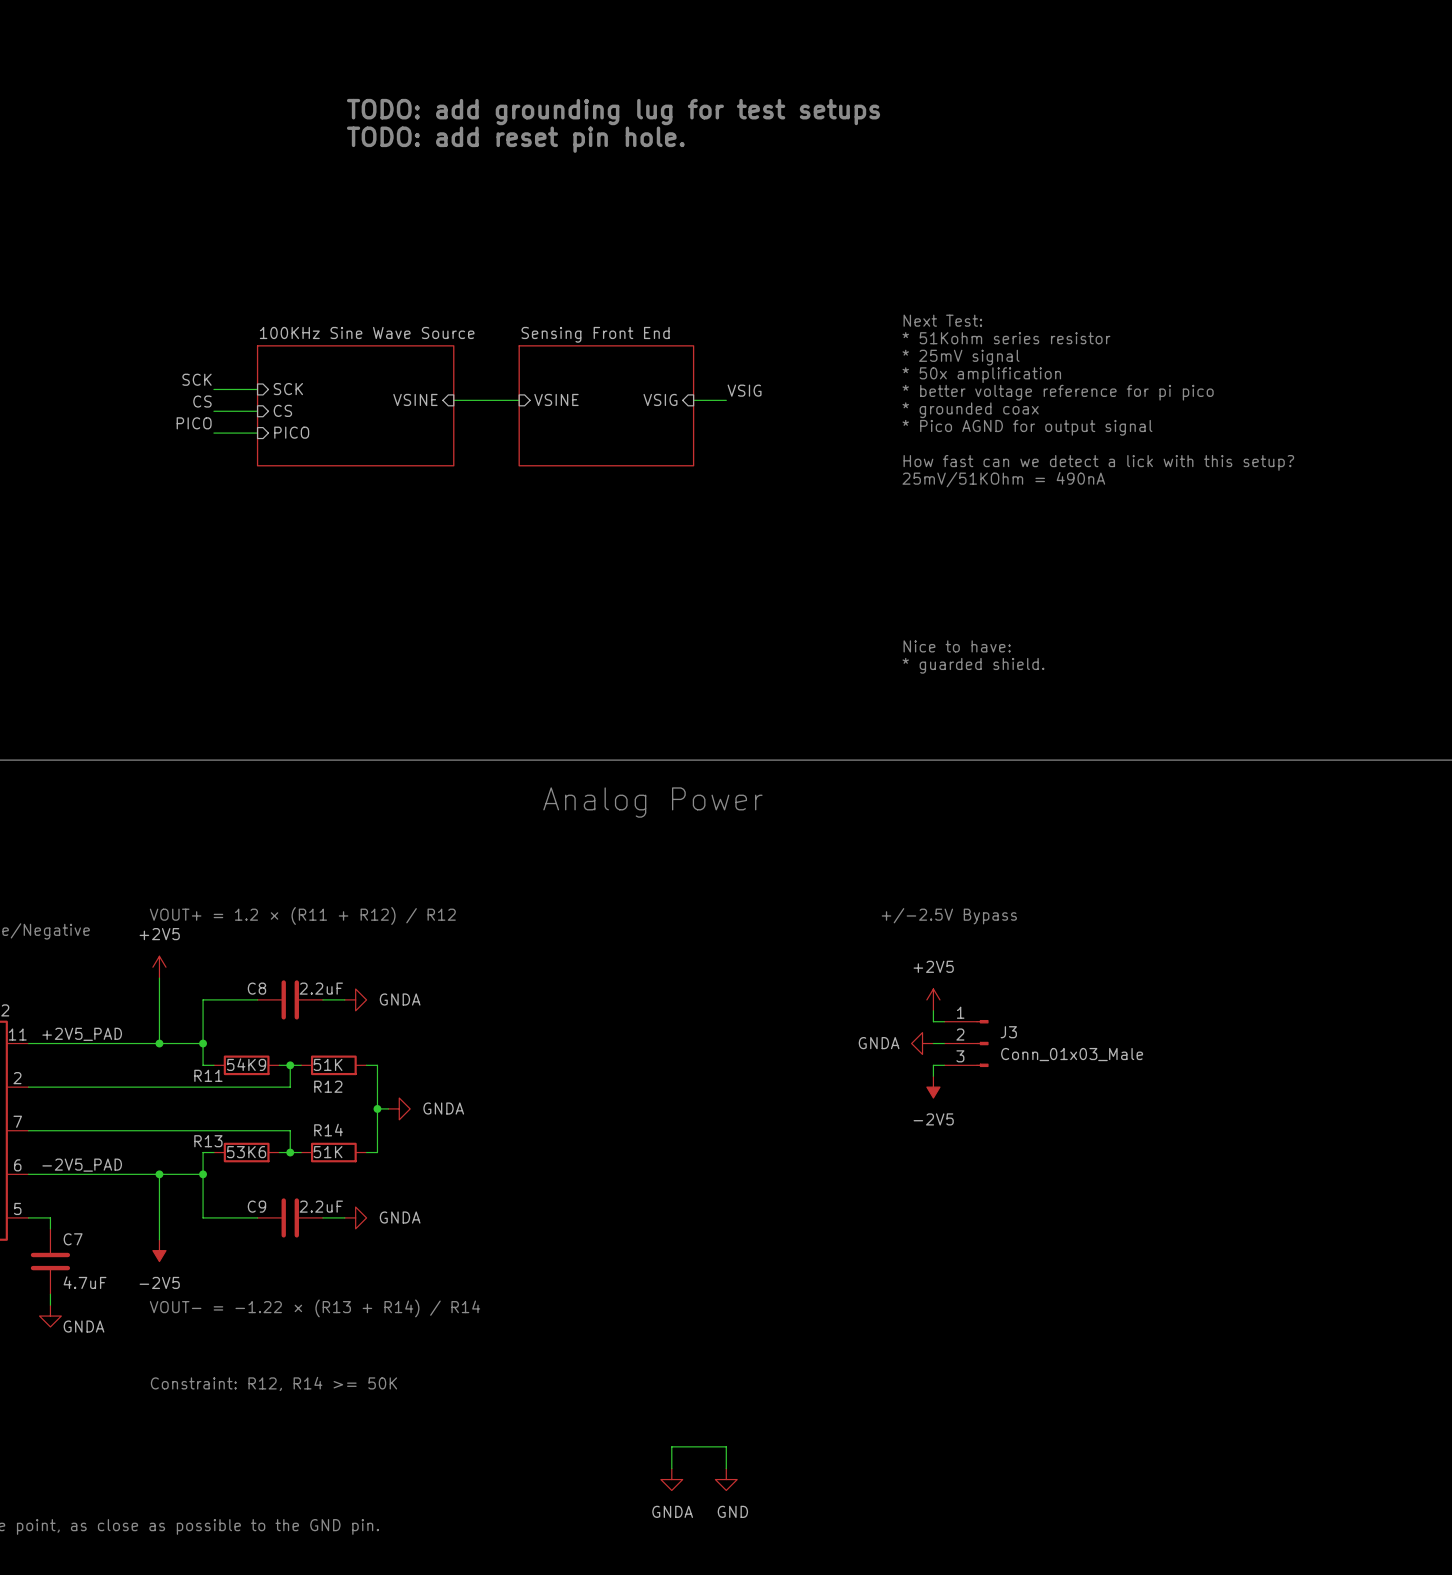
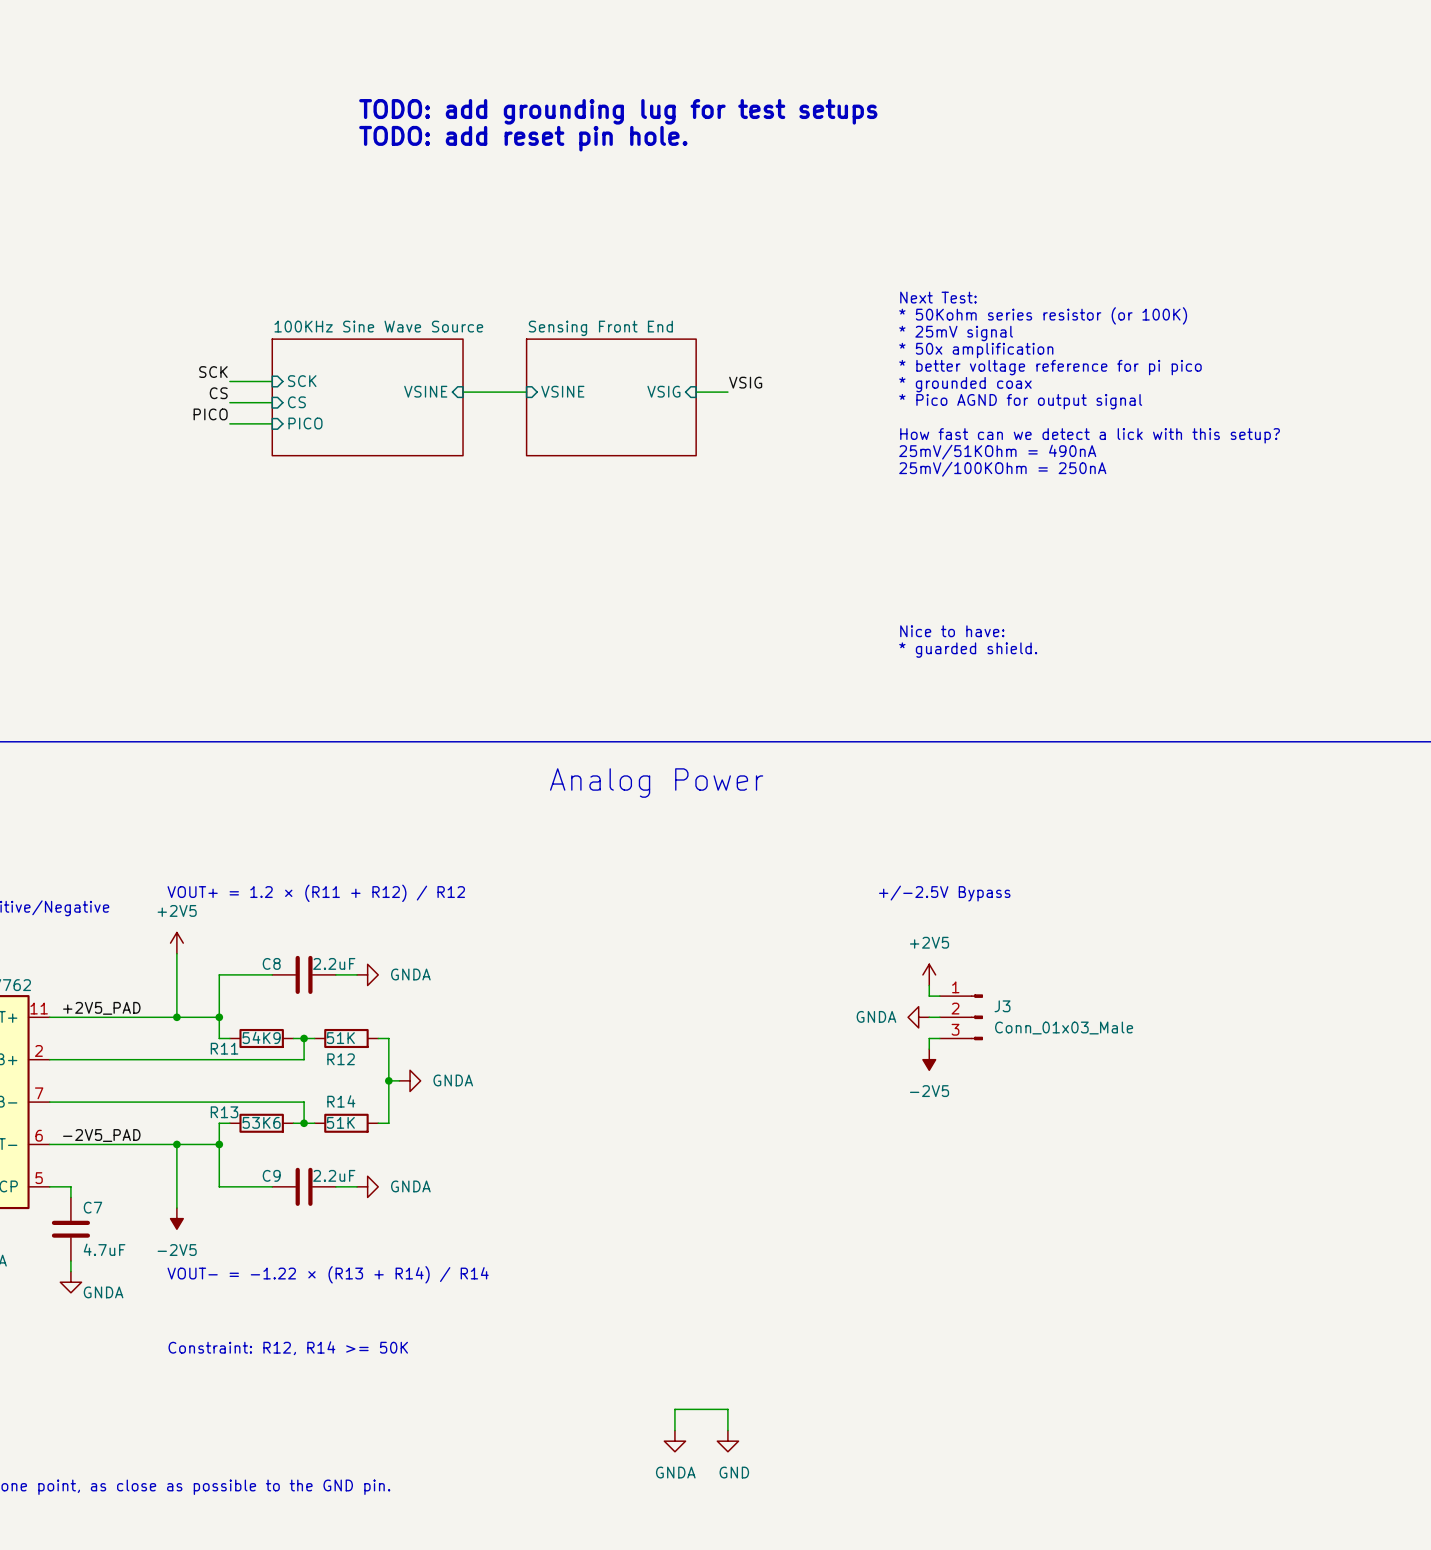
text: none -> Next Test: (938, 297)
text: Next Test: (942, 320) -> * 50Kohm series resistor (or 100K) (1043, 315)
text: * 51Kohm series resistor (1006, 338) -> * 25mV signal (956, 333)
text: * 25mV signal (961, 357) -> * 50x amplification (976, 350)
text: * 50x amplification (981, 375) -> * better voltage reference for pi pico (1050, 367)
text: * better voltage reference for pi pico (1058, 392) -> * grounded coax (965, 384)
text: * grounded coax (970, 410) -> * Pico AGND for output signal (1020, 401)
text: * Pico AGND for output signal (1027, 427) -> none
text: none -> How fast can we detect a lick with this setup? (1090, 435)
text: How fast can we detect a lick with this setup? (1098, 462) -> 25mV/51KOhm = 490nA (997, 452)
text: 25mV/51KOhm = 490nA (1003, 479) -> 25mV/100KOhm = 250nA (1002, 469)

